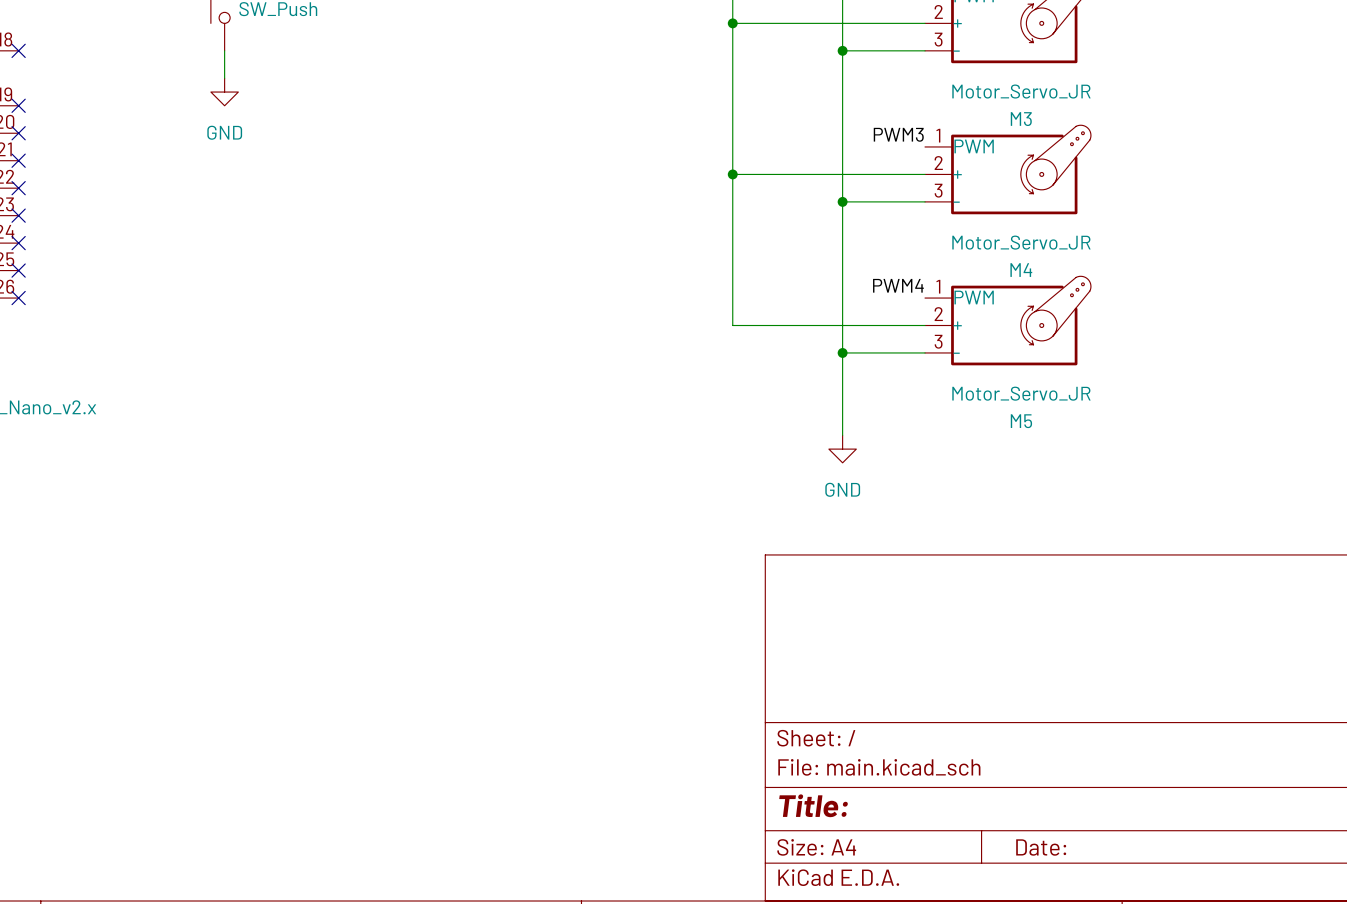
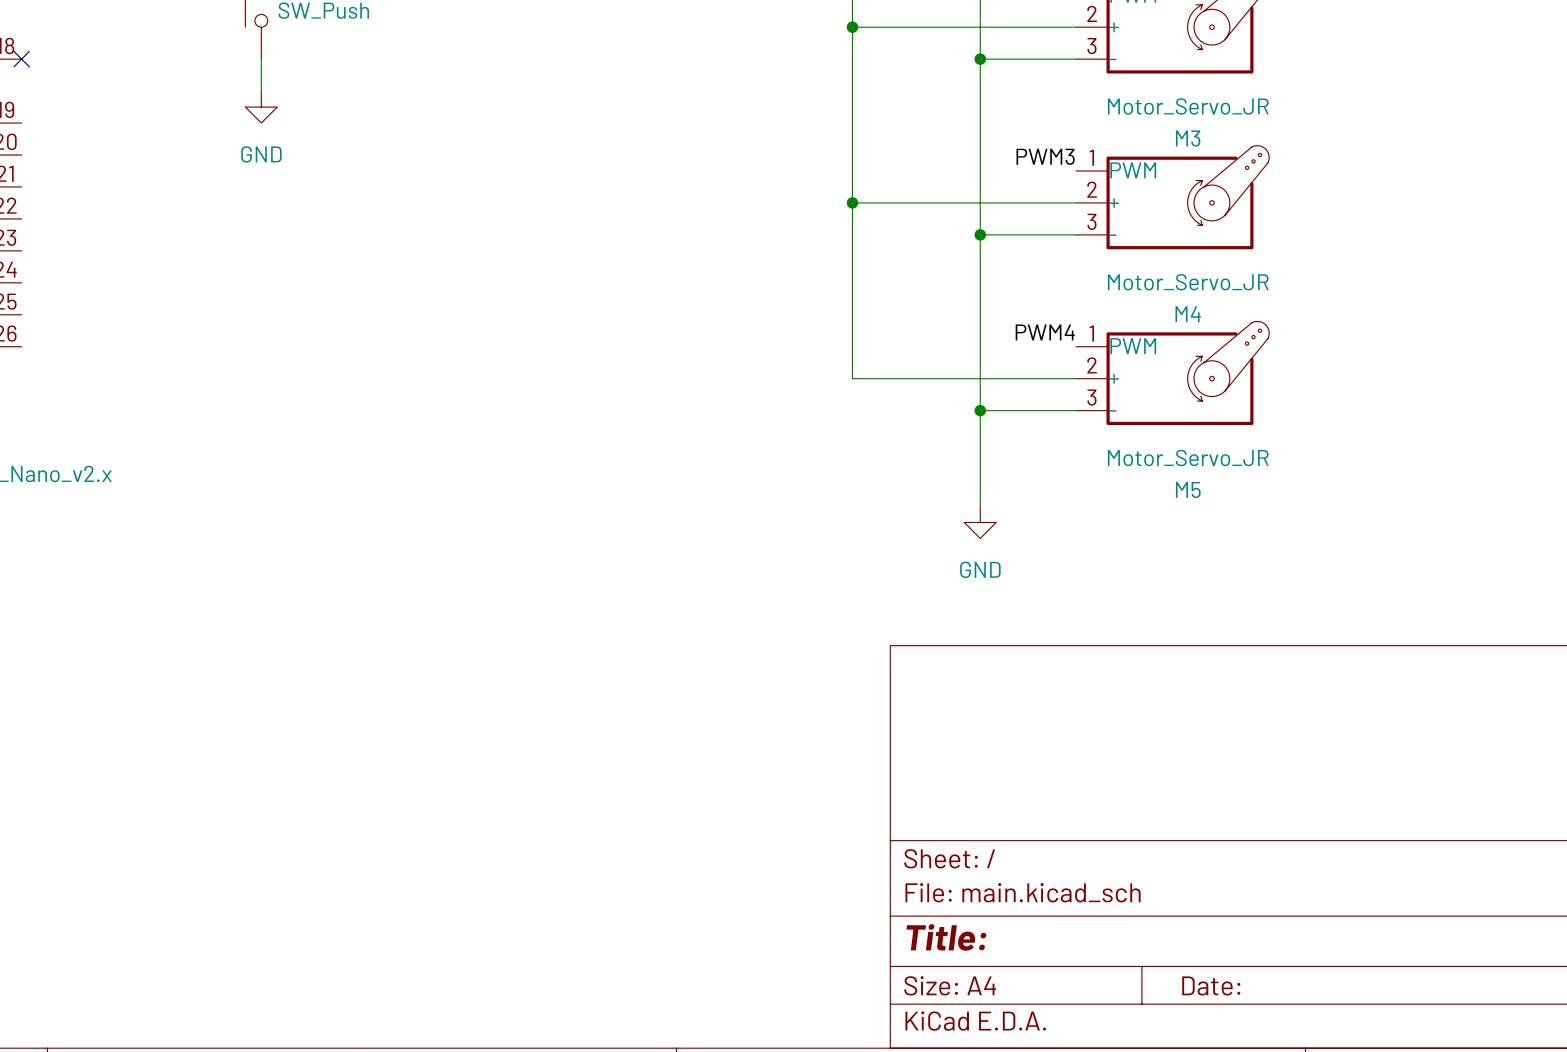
no-connect mark: (18, 105) -> none
no-connect mark: (18, 133) -> none
no-connect mark: (18, 160) -> none
no-connect mark: (18, 188) -> none
no-connect mark: (18, 215) -> none
no-connect mark: (18, 243) -> none
no-connect mark: (18, 270) -> none
no-connect mark: (18, 298) -> none

